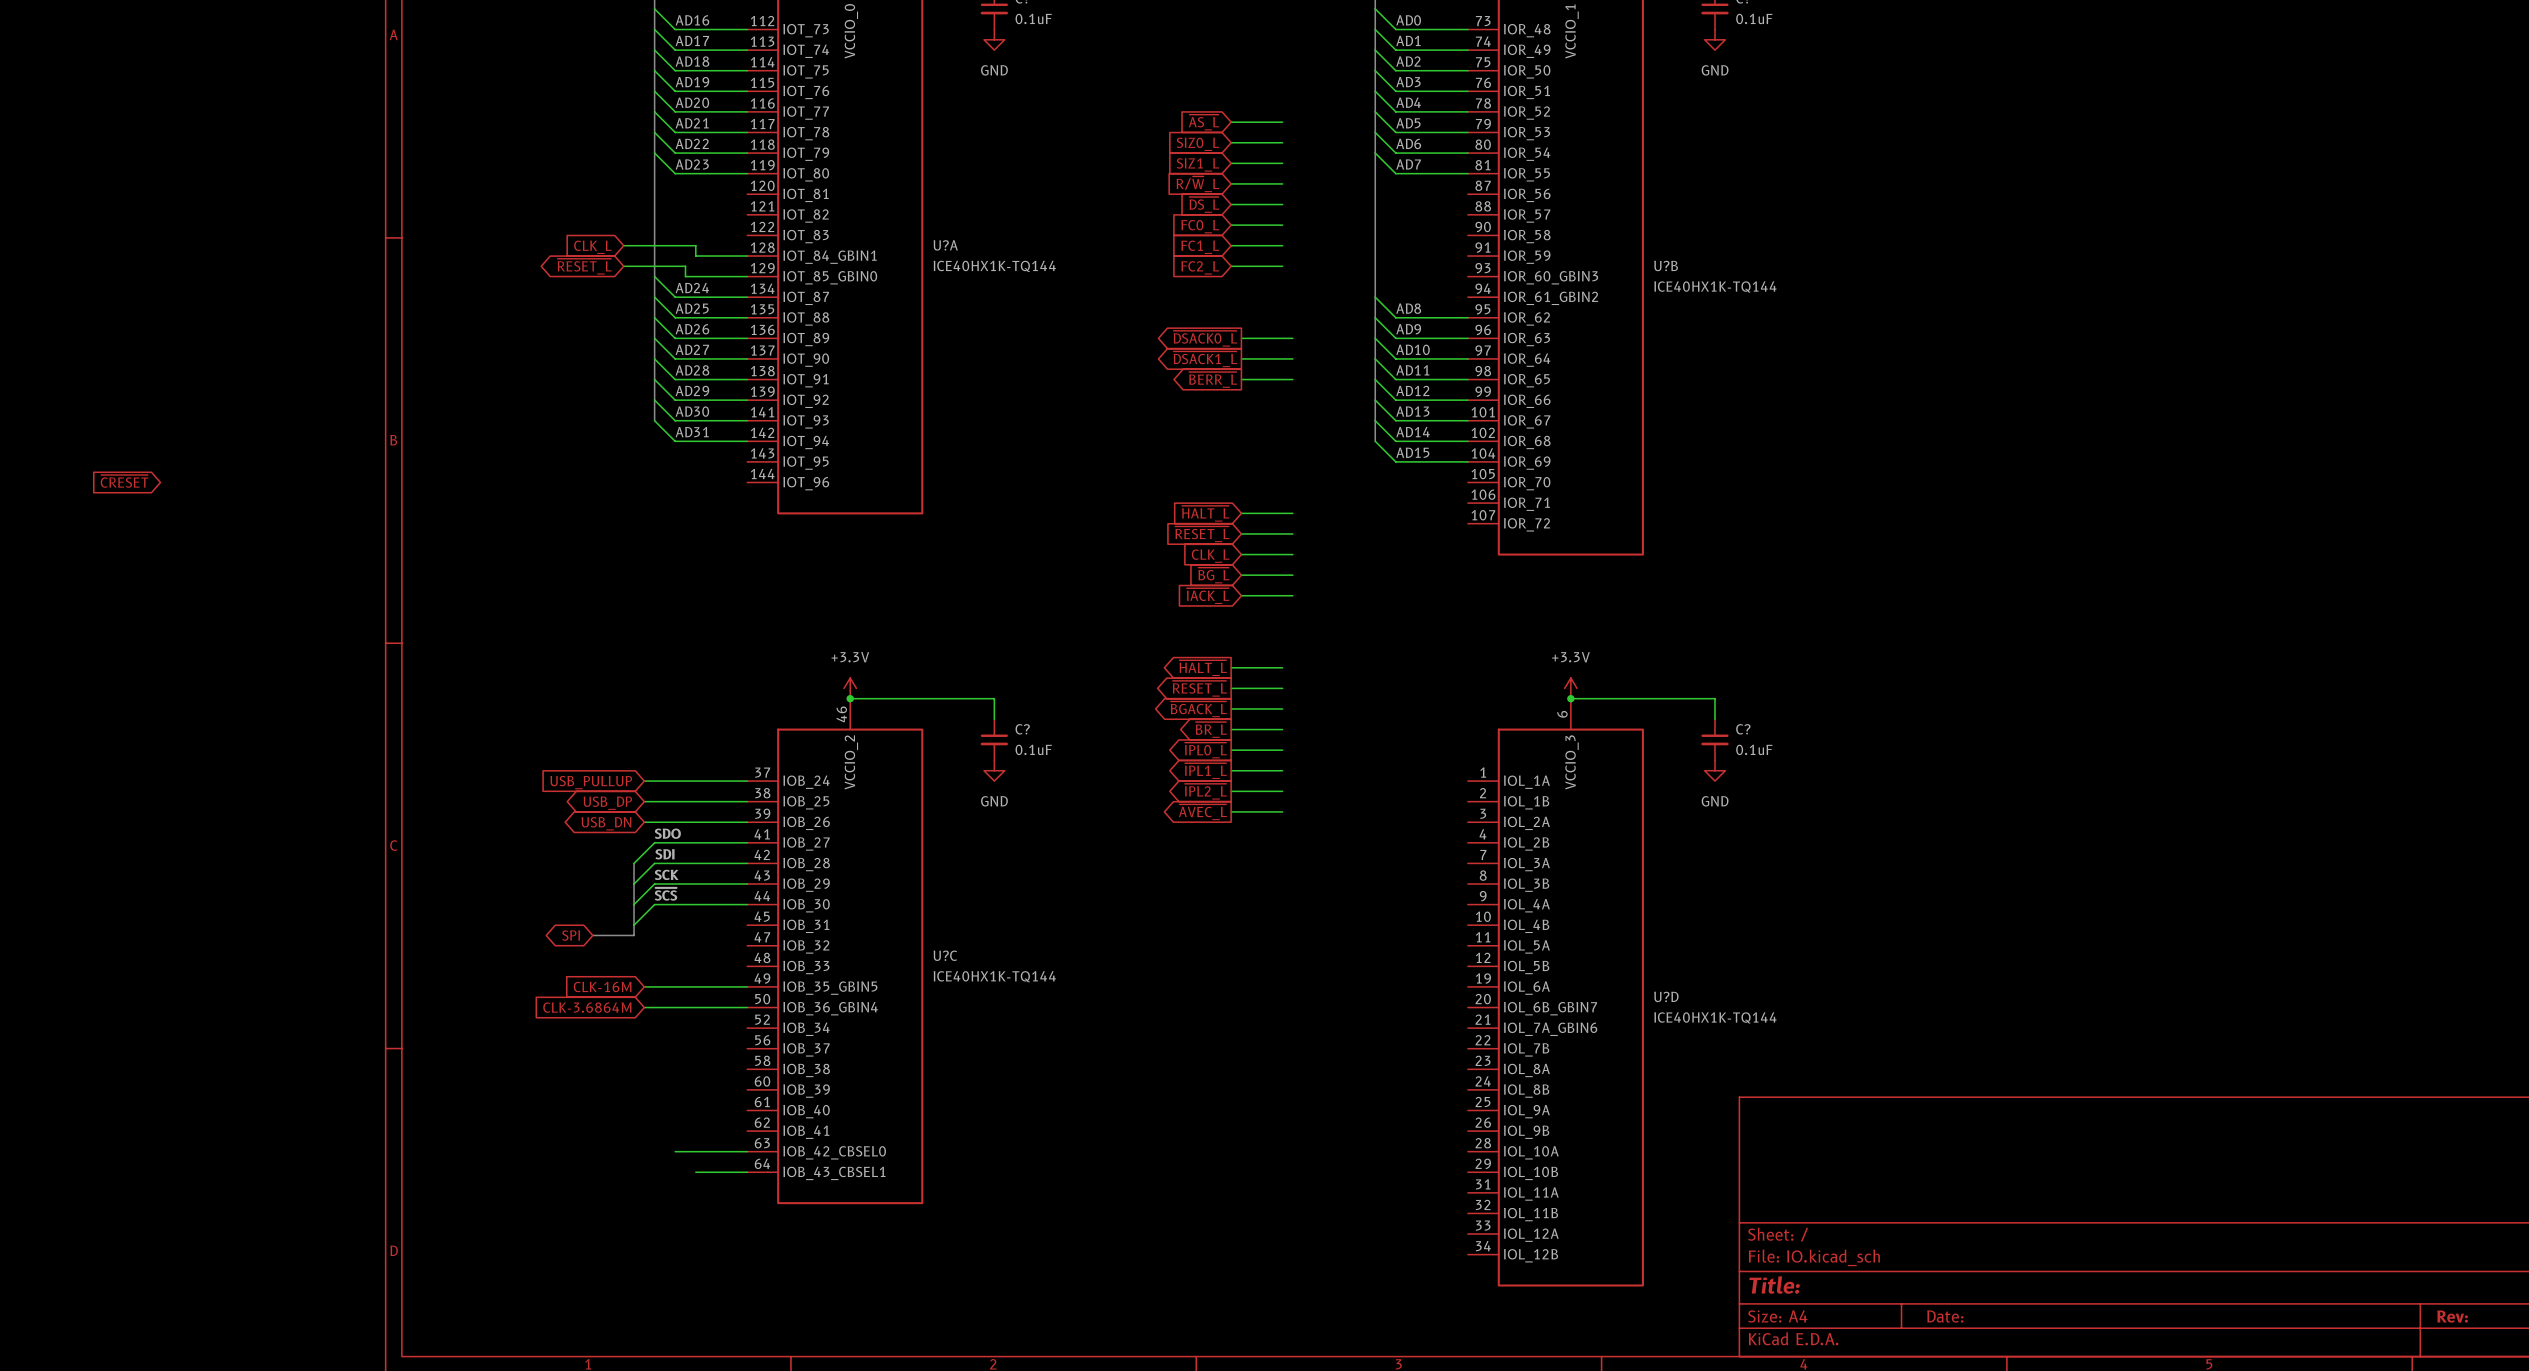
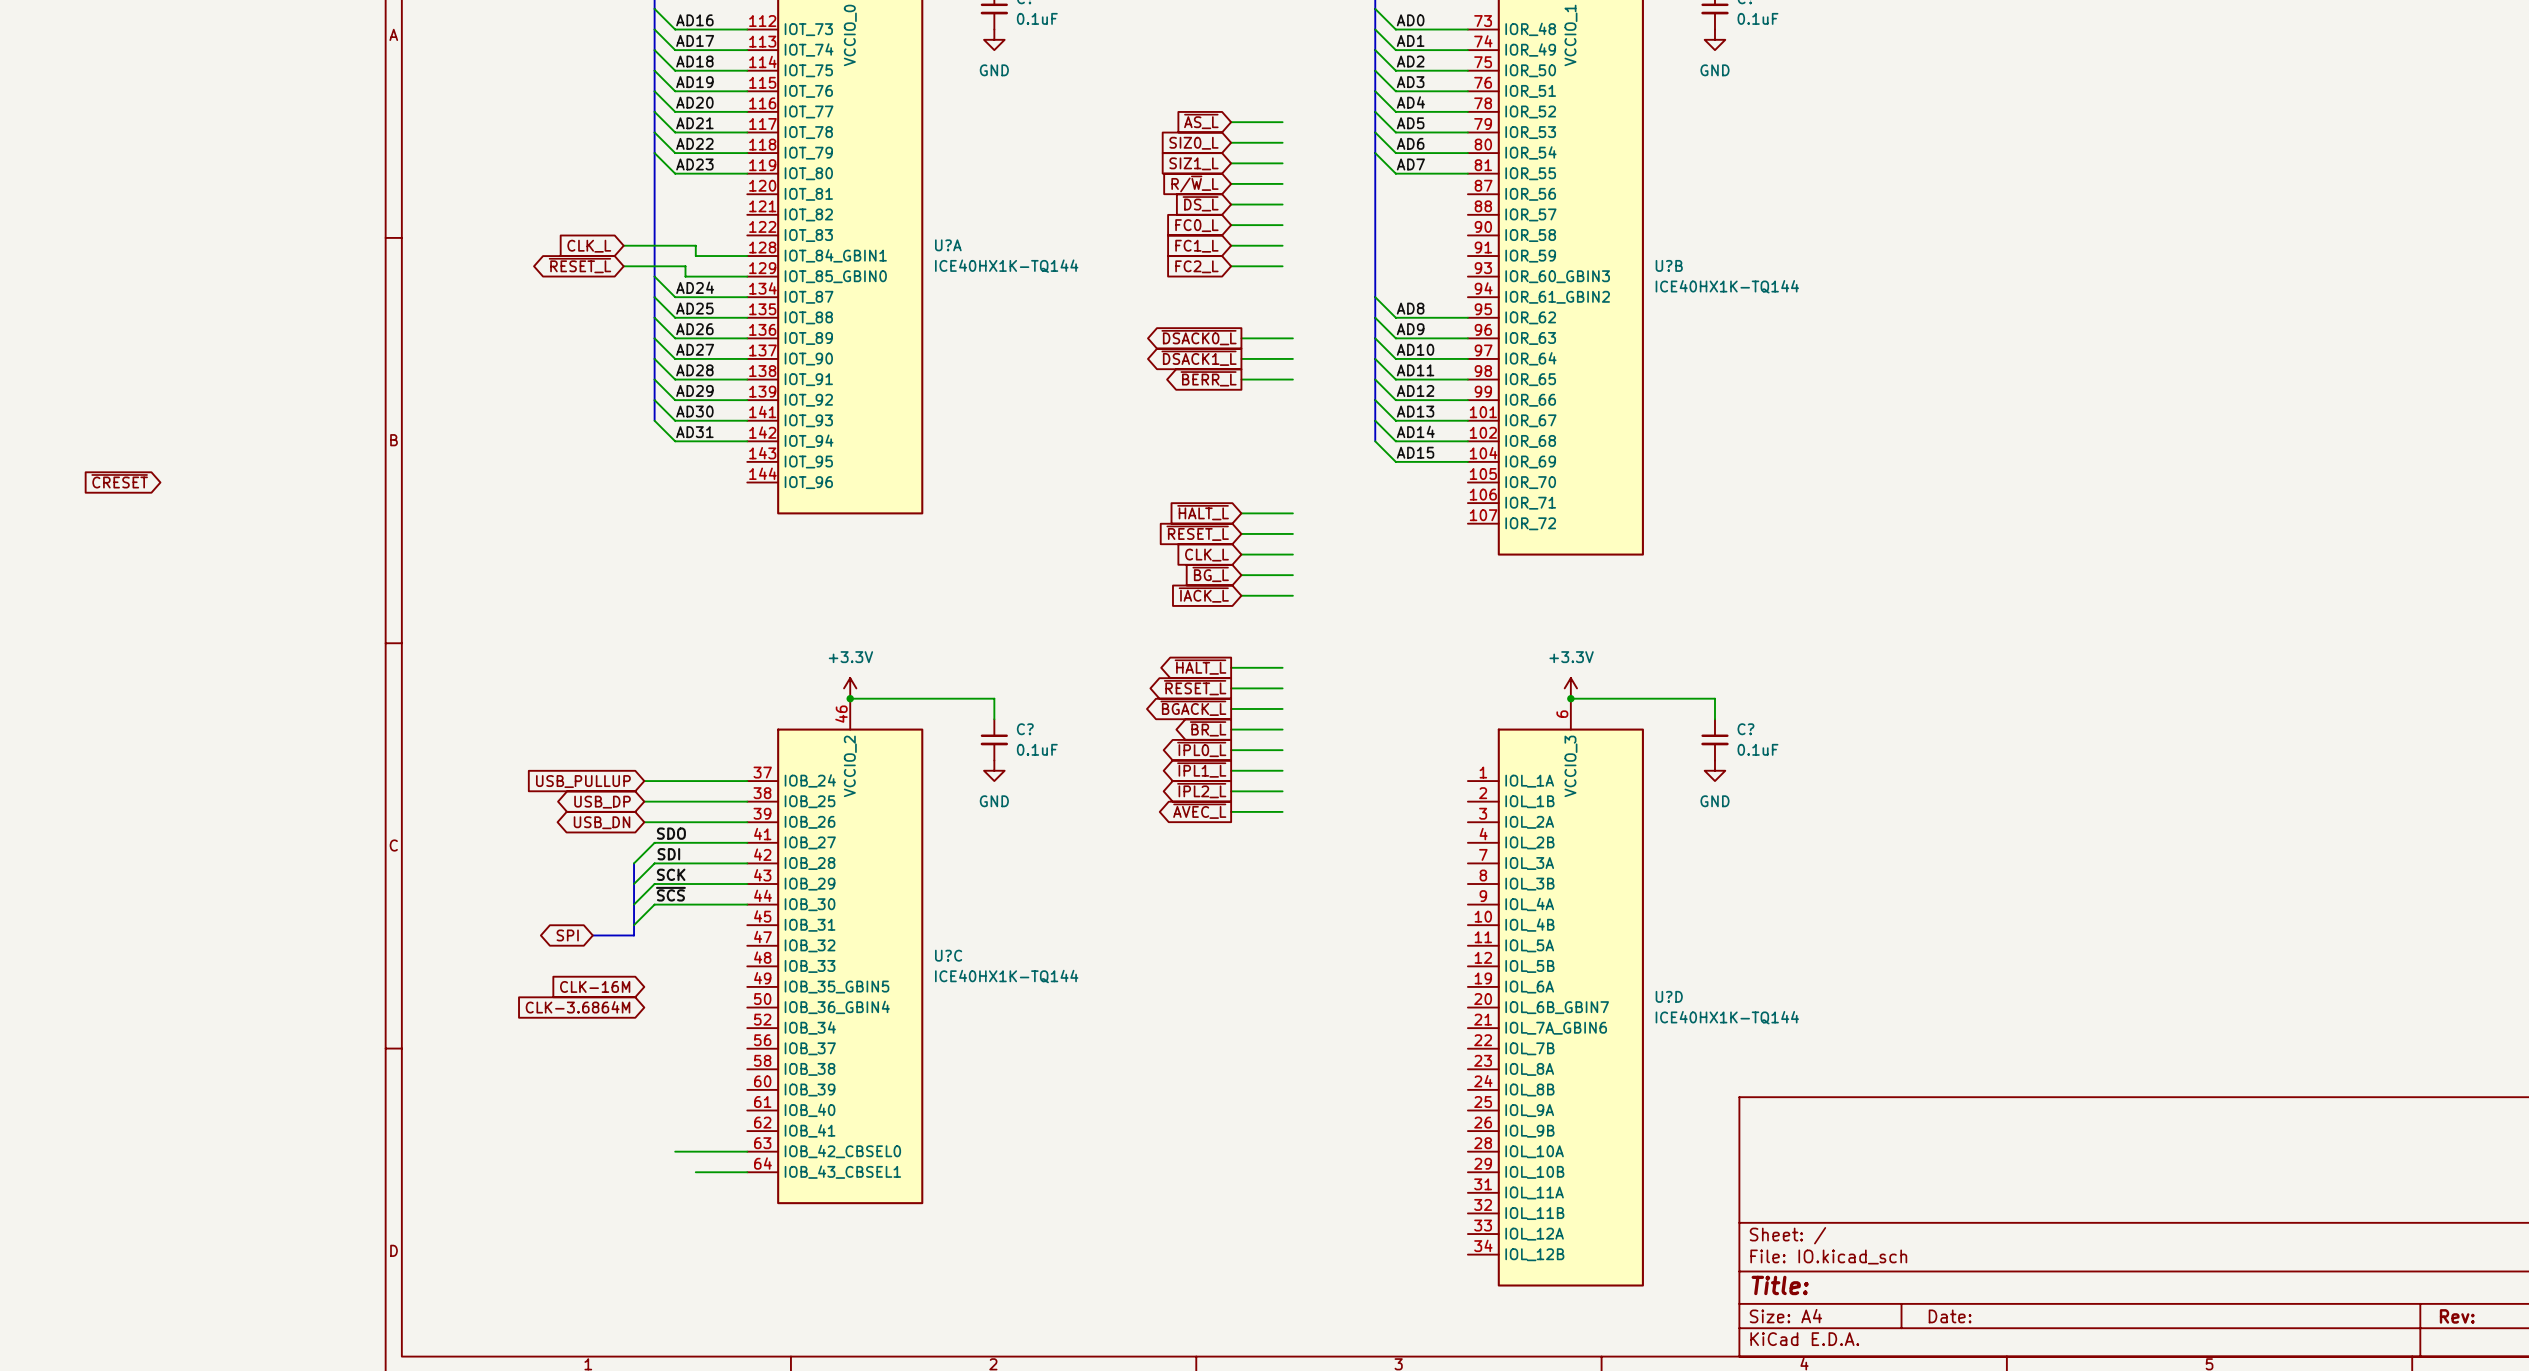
wire: (644, 986) (747, 986) -> none
wire: (644, 1007) (747, 1007) -> none

